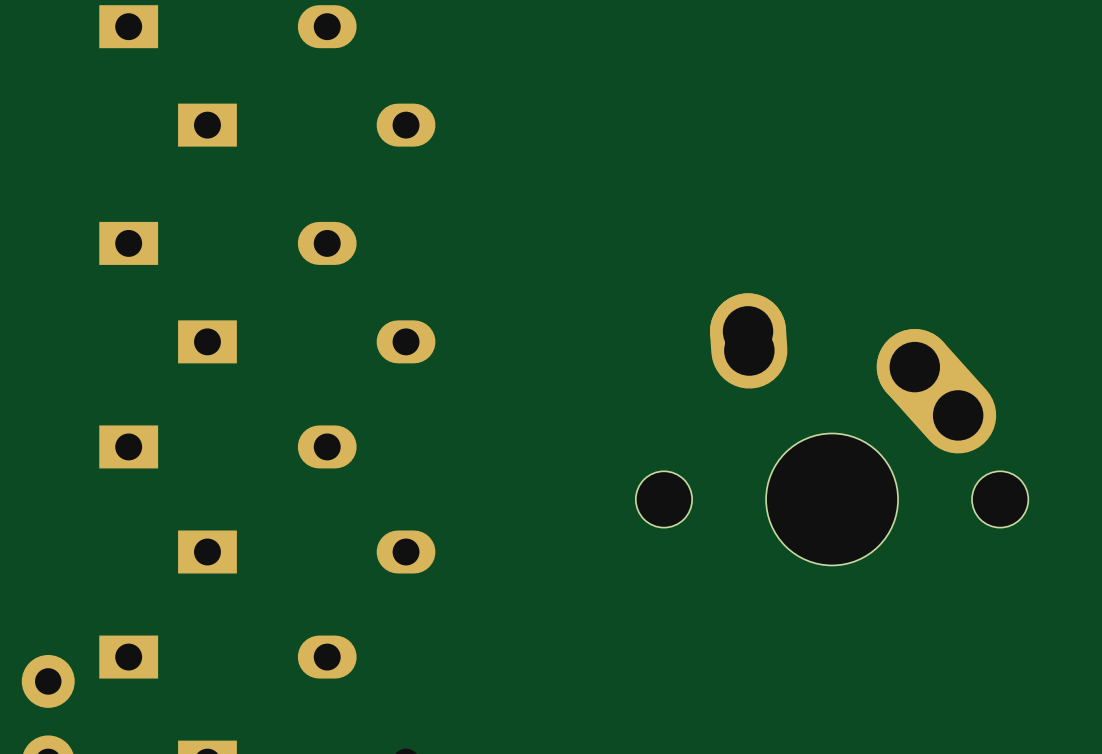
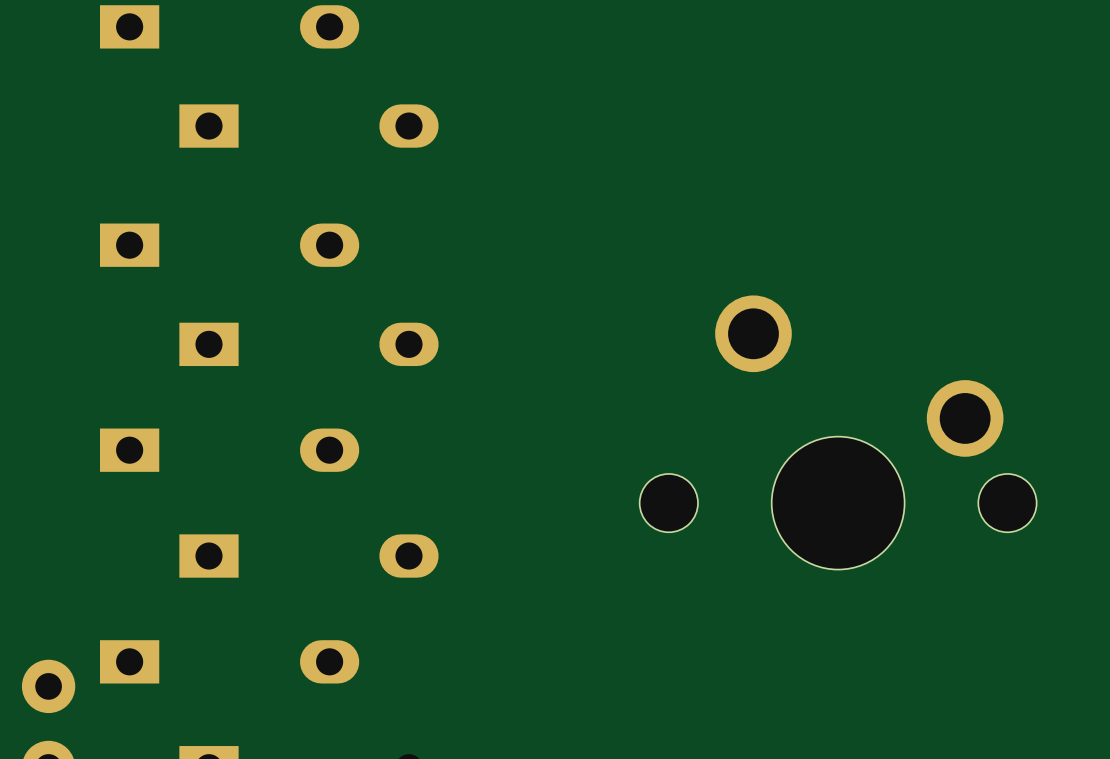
part footprint: [635, 293, 1029, 566] -> [639, 295, 1037, 570]

